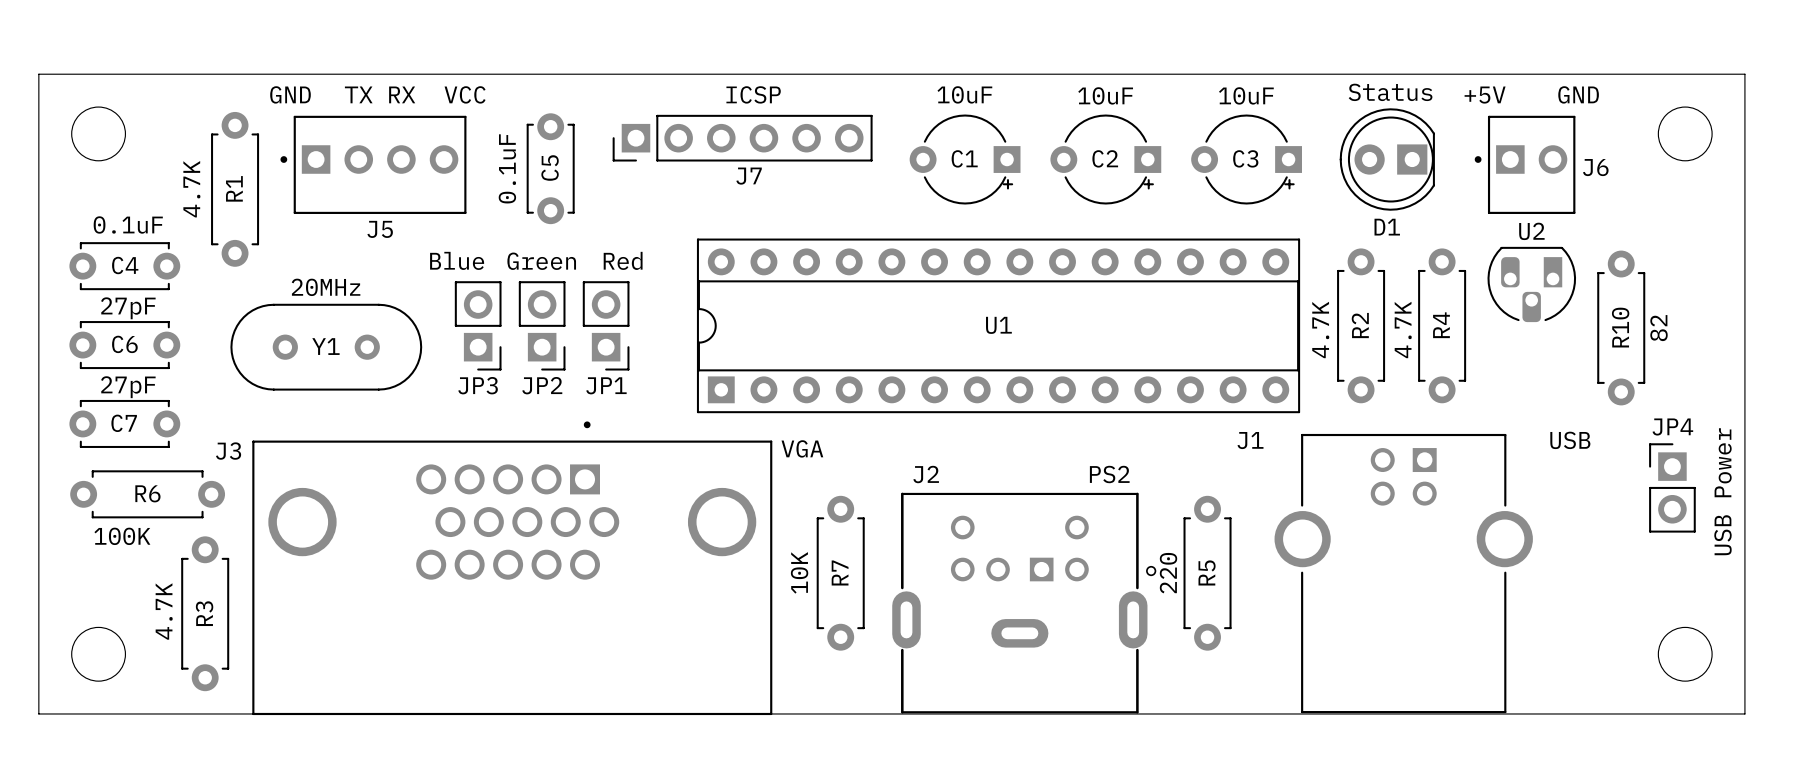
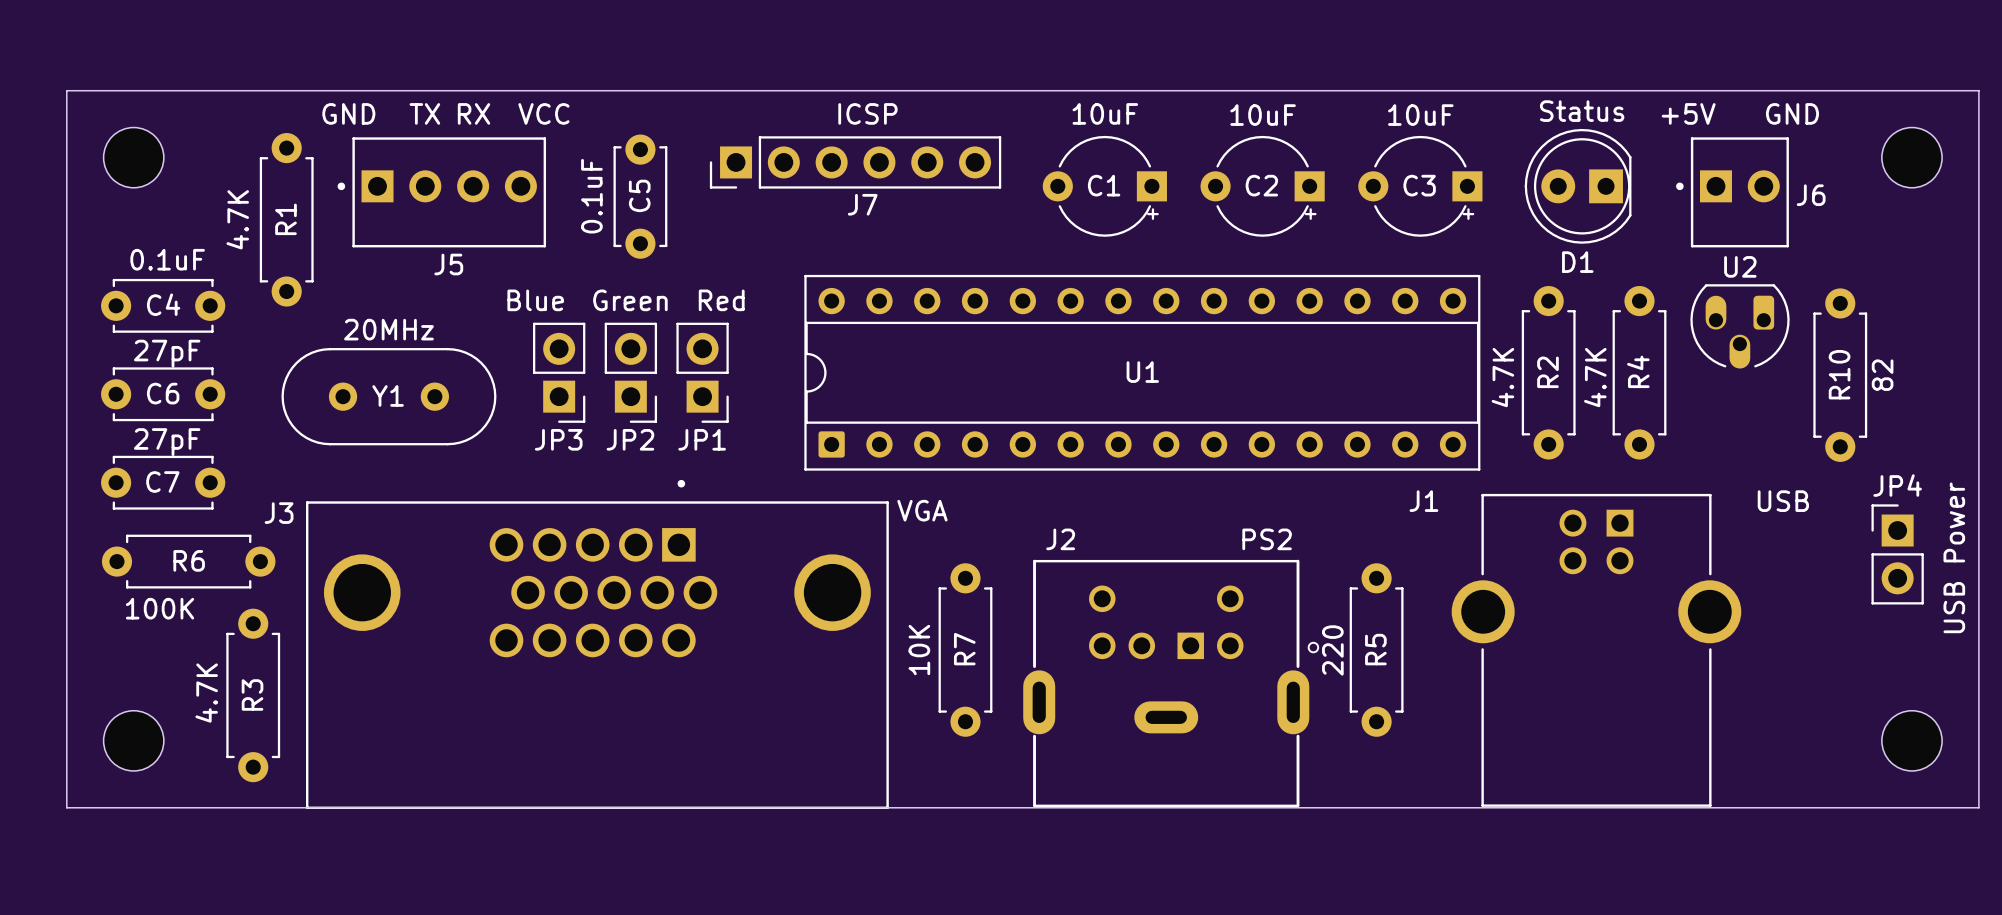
U1 footprint: [696, 238, 1301, 414] -> [804, 274, 1481, 471]
U2 footprint: [1487, 246, 1577, 323] -> [1690, 284, 1790, 369]

